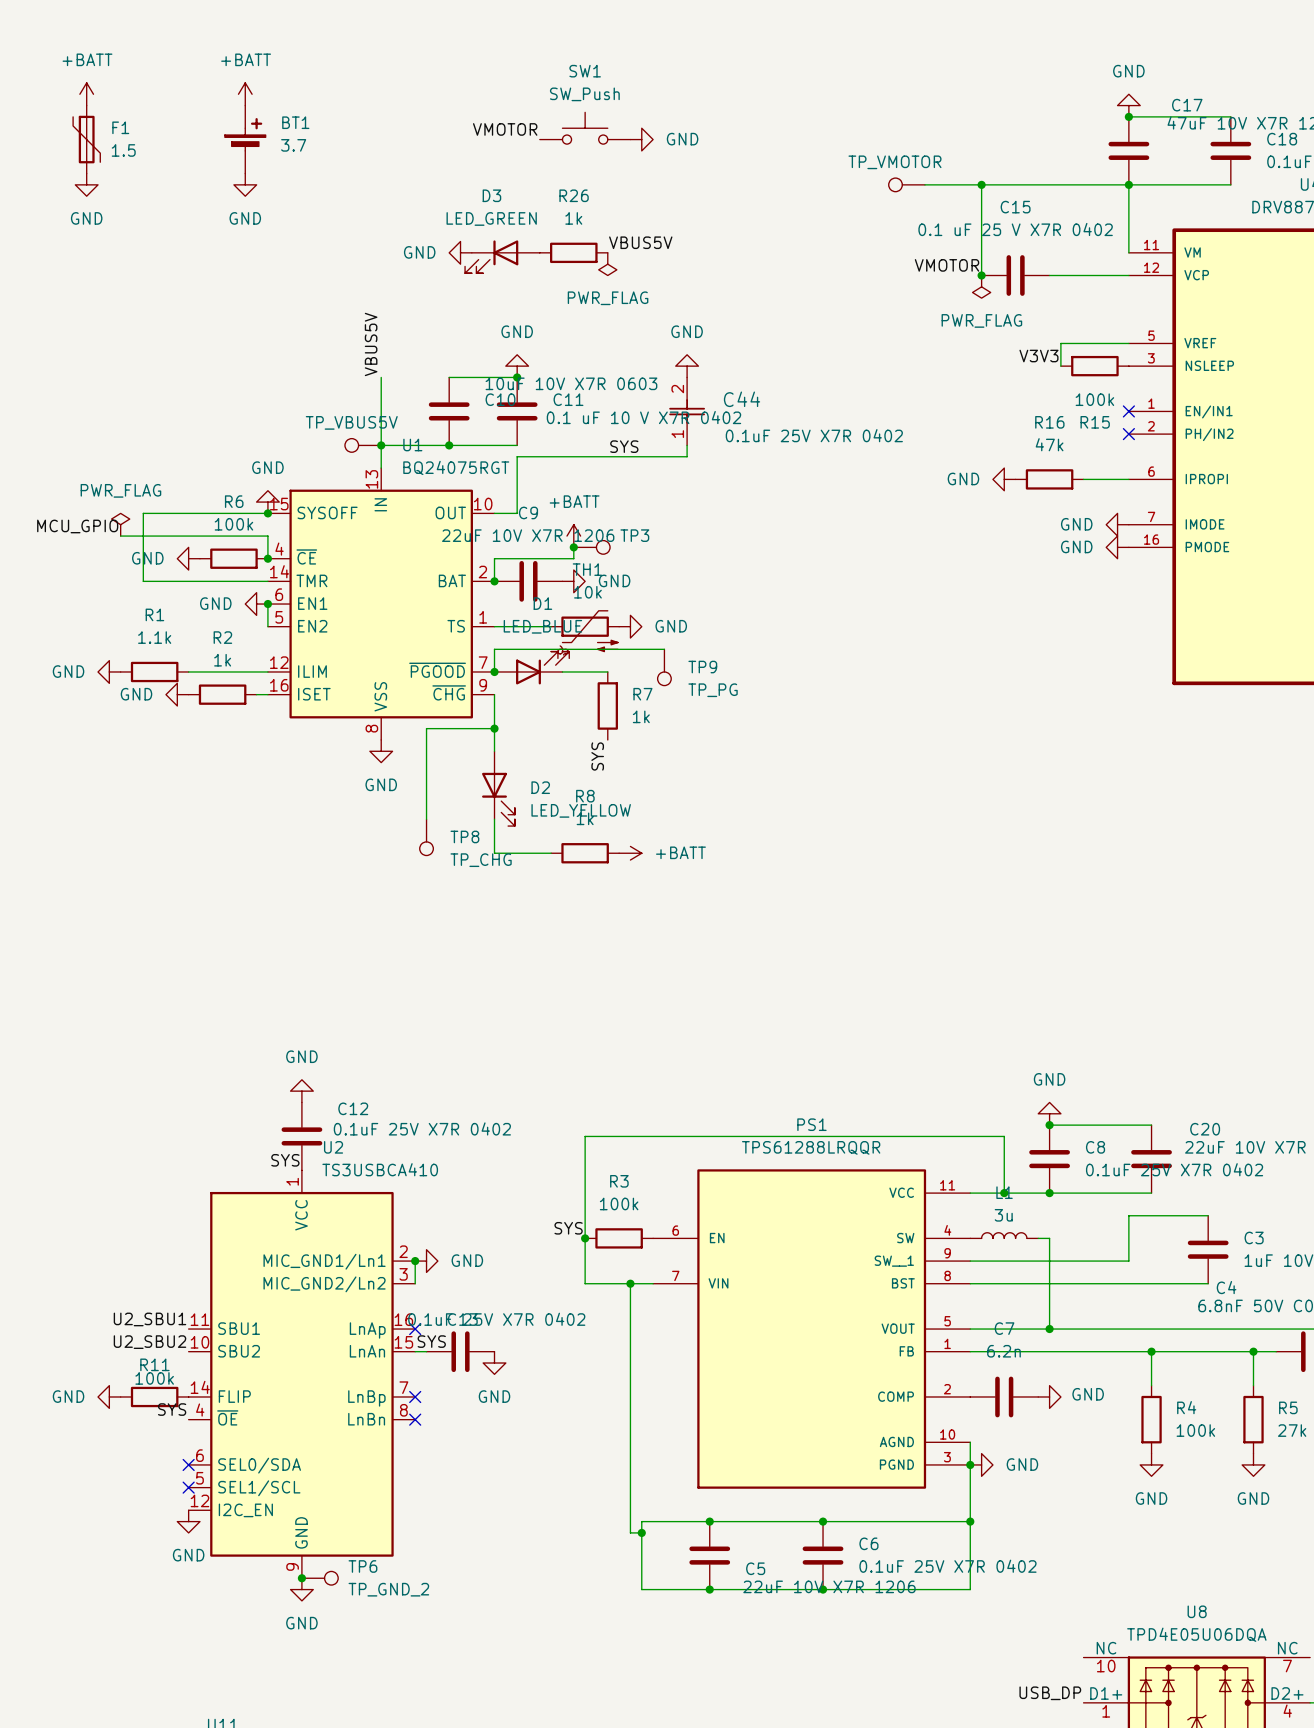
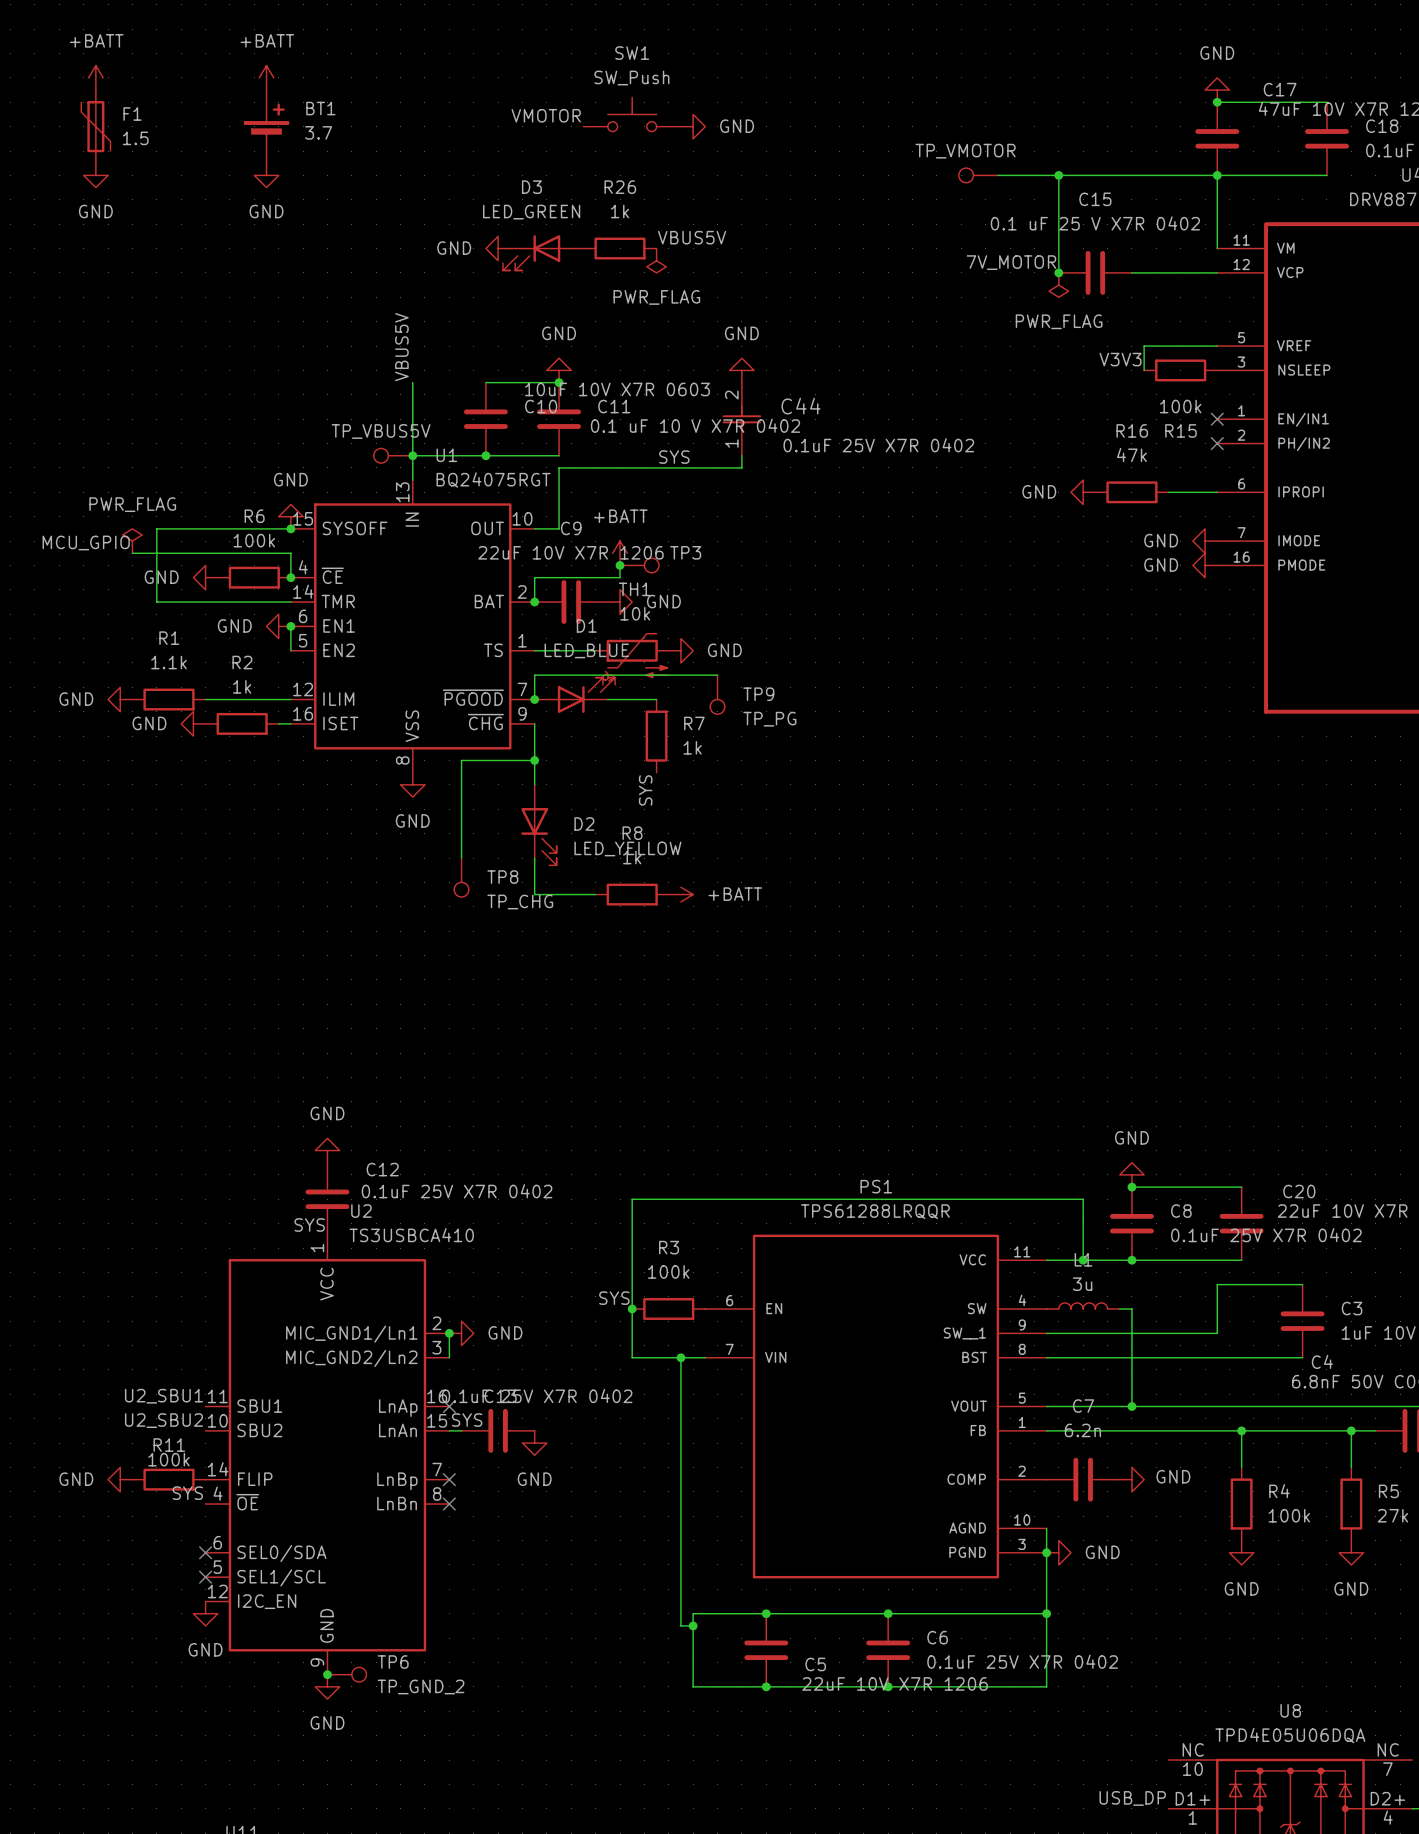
label: VMOTOR (947, 265) -> 7V_MOTOR (1011, 262)

